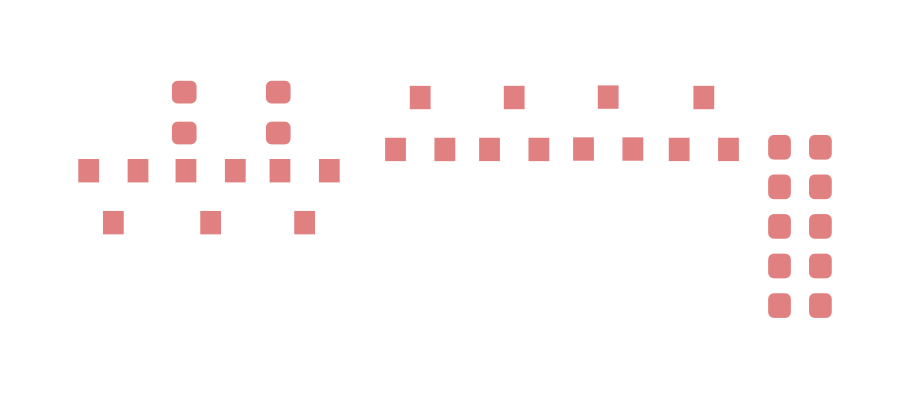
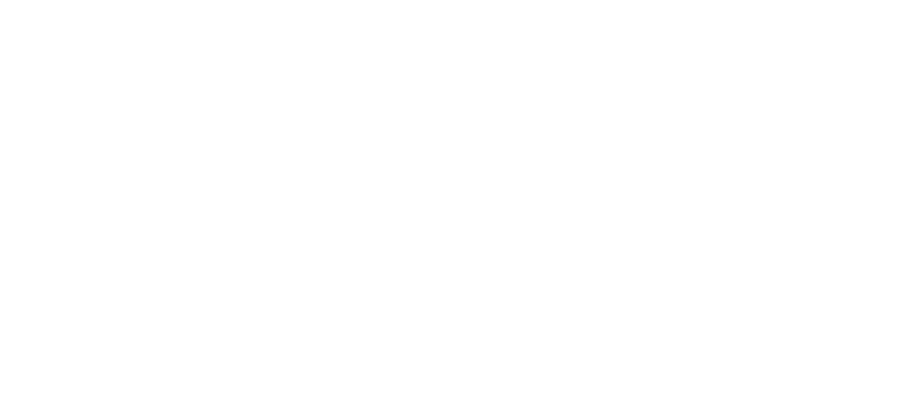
part: (184, 112) -> none
part: (278, 112) -> none
part: (420, 123) -> none
part: (514, 123) -> none
part: (608, 123) -> none
part: (703, 123) -> none
part: (799, 147) -> none
part: (799, 186) -> none
part: (113, 196) -> none
part: (210, 196) -> none
part: (304, 196) -> none
part: (799, 226) -> none
part: (799, 265) -> none
part: (799, 305) -> none

